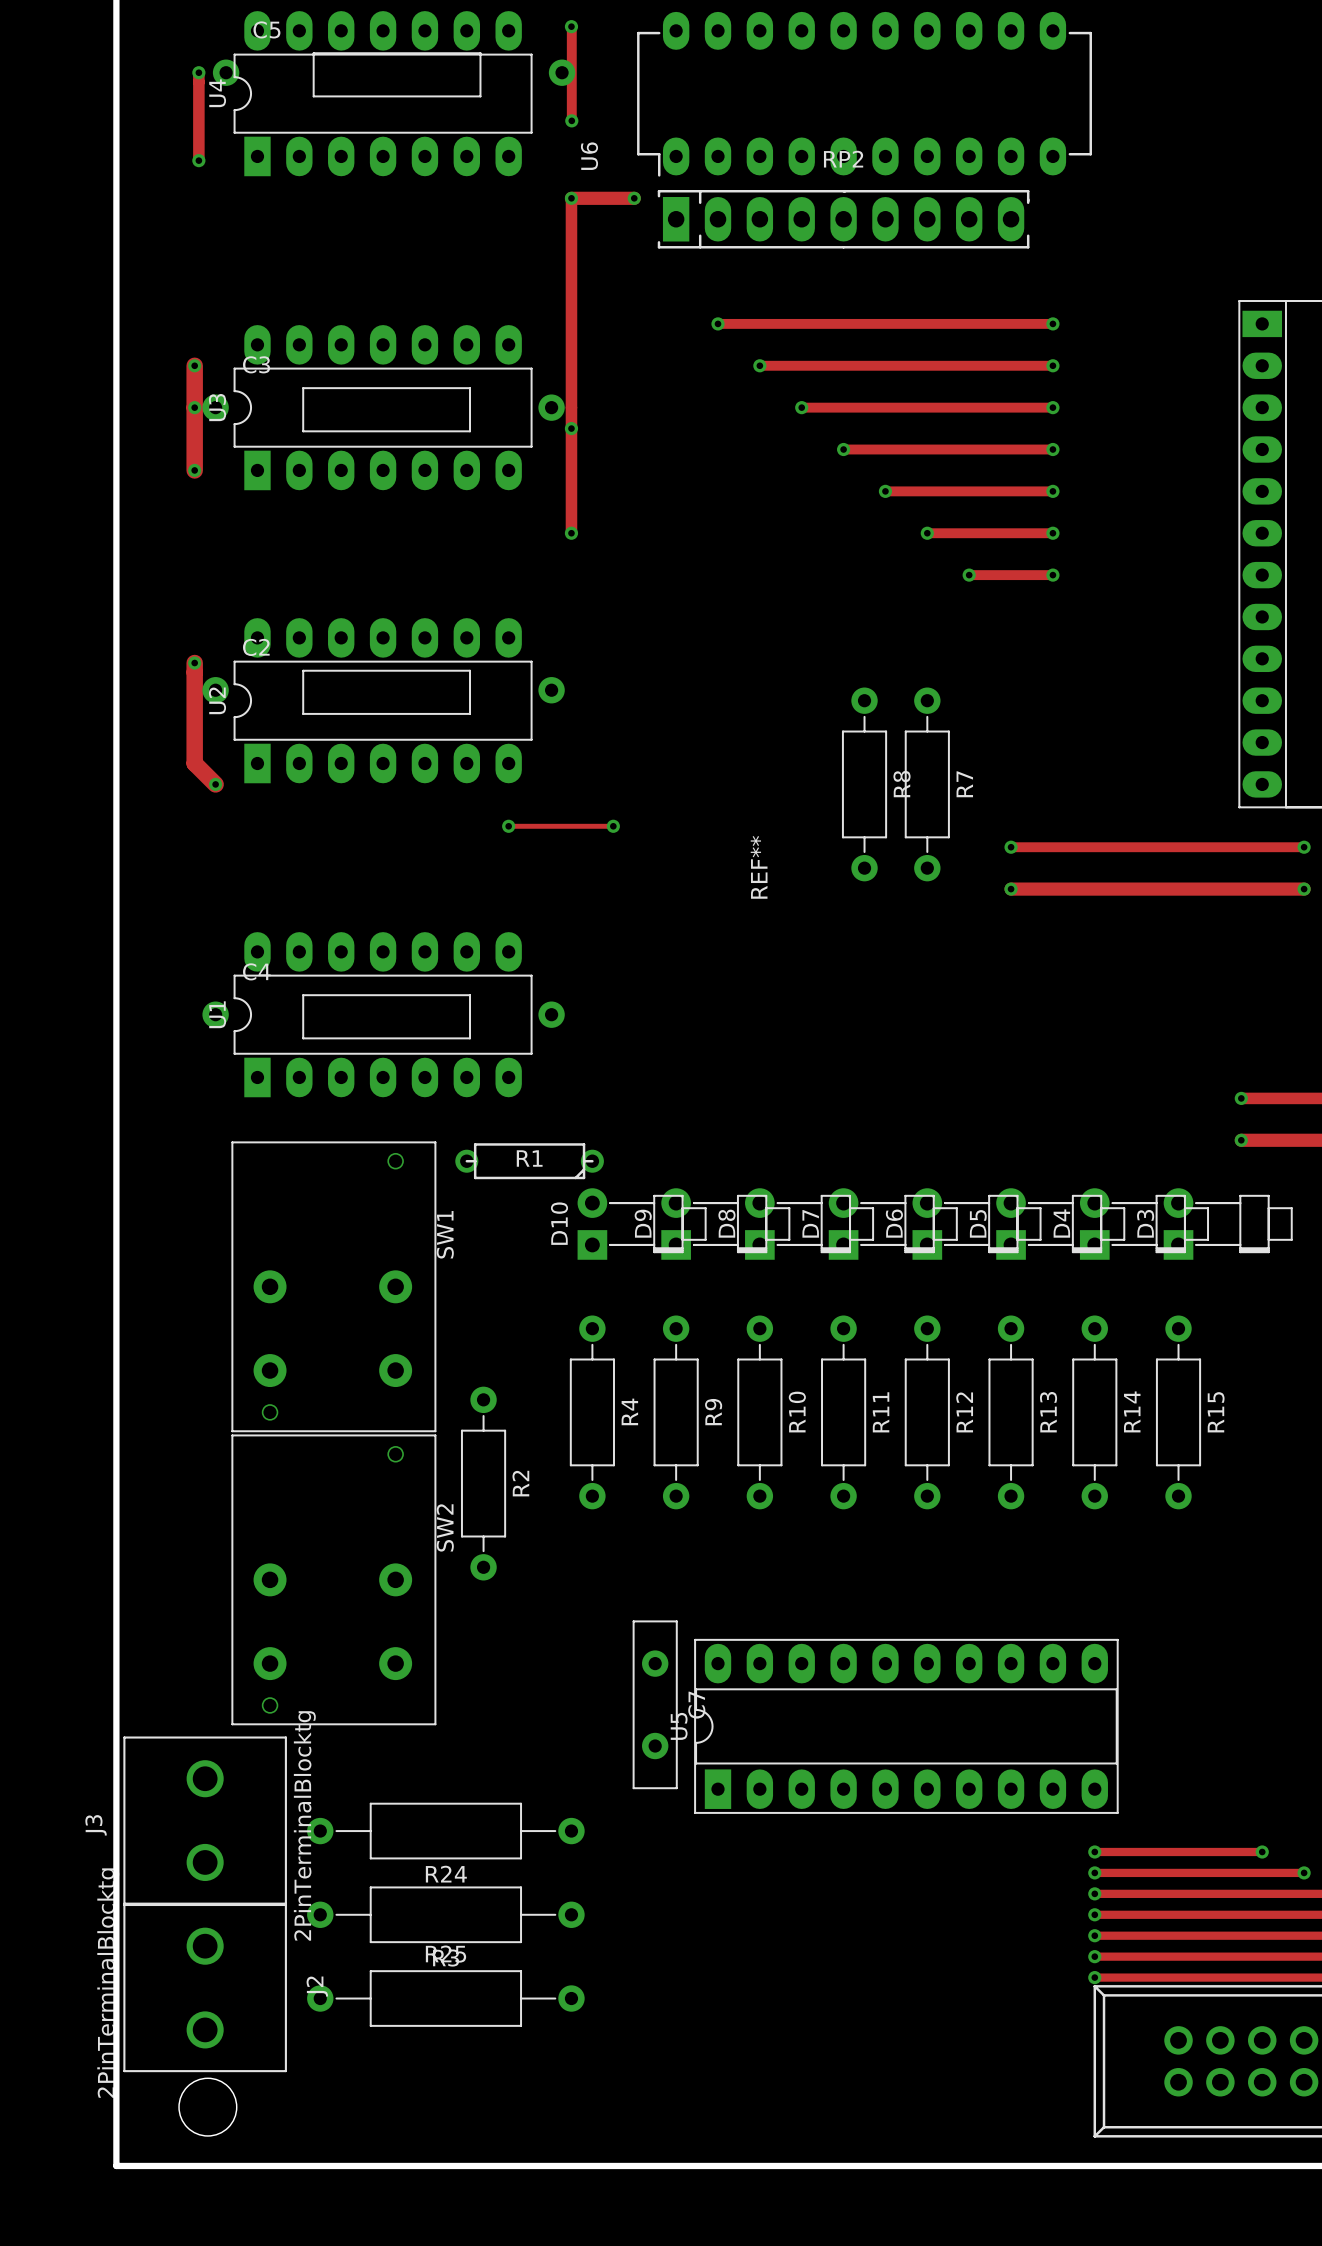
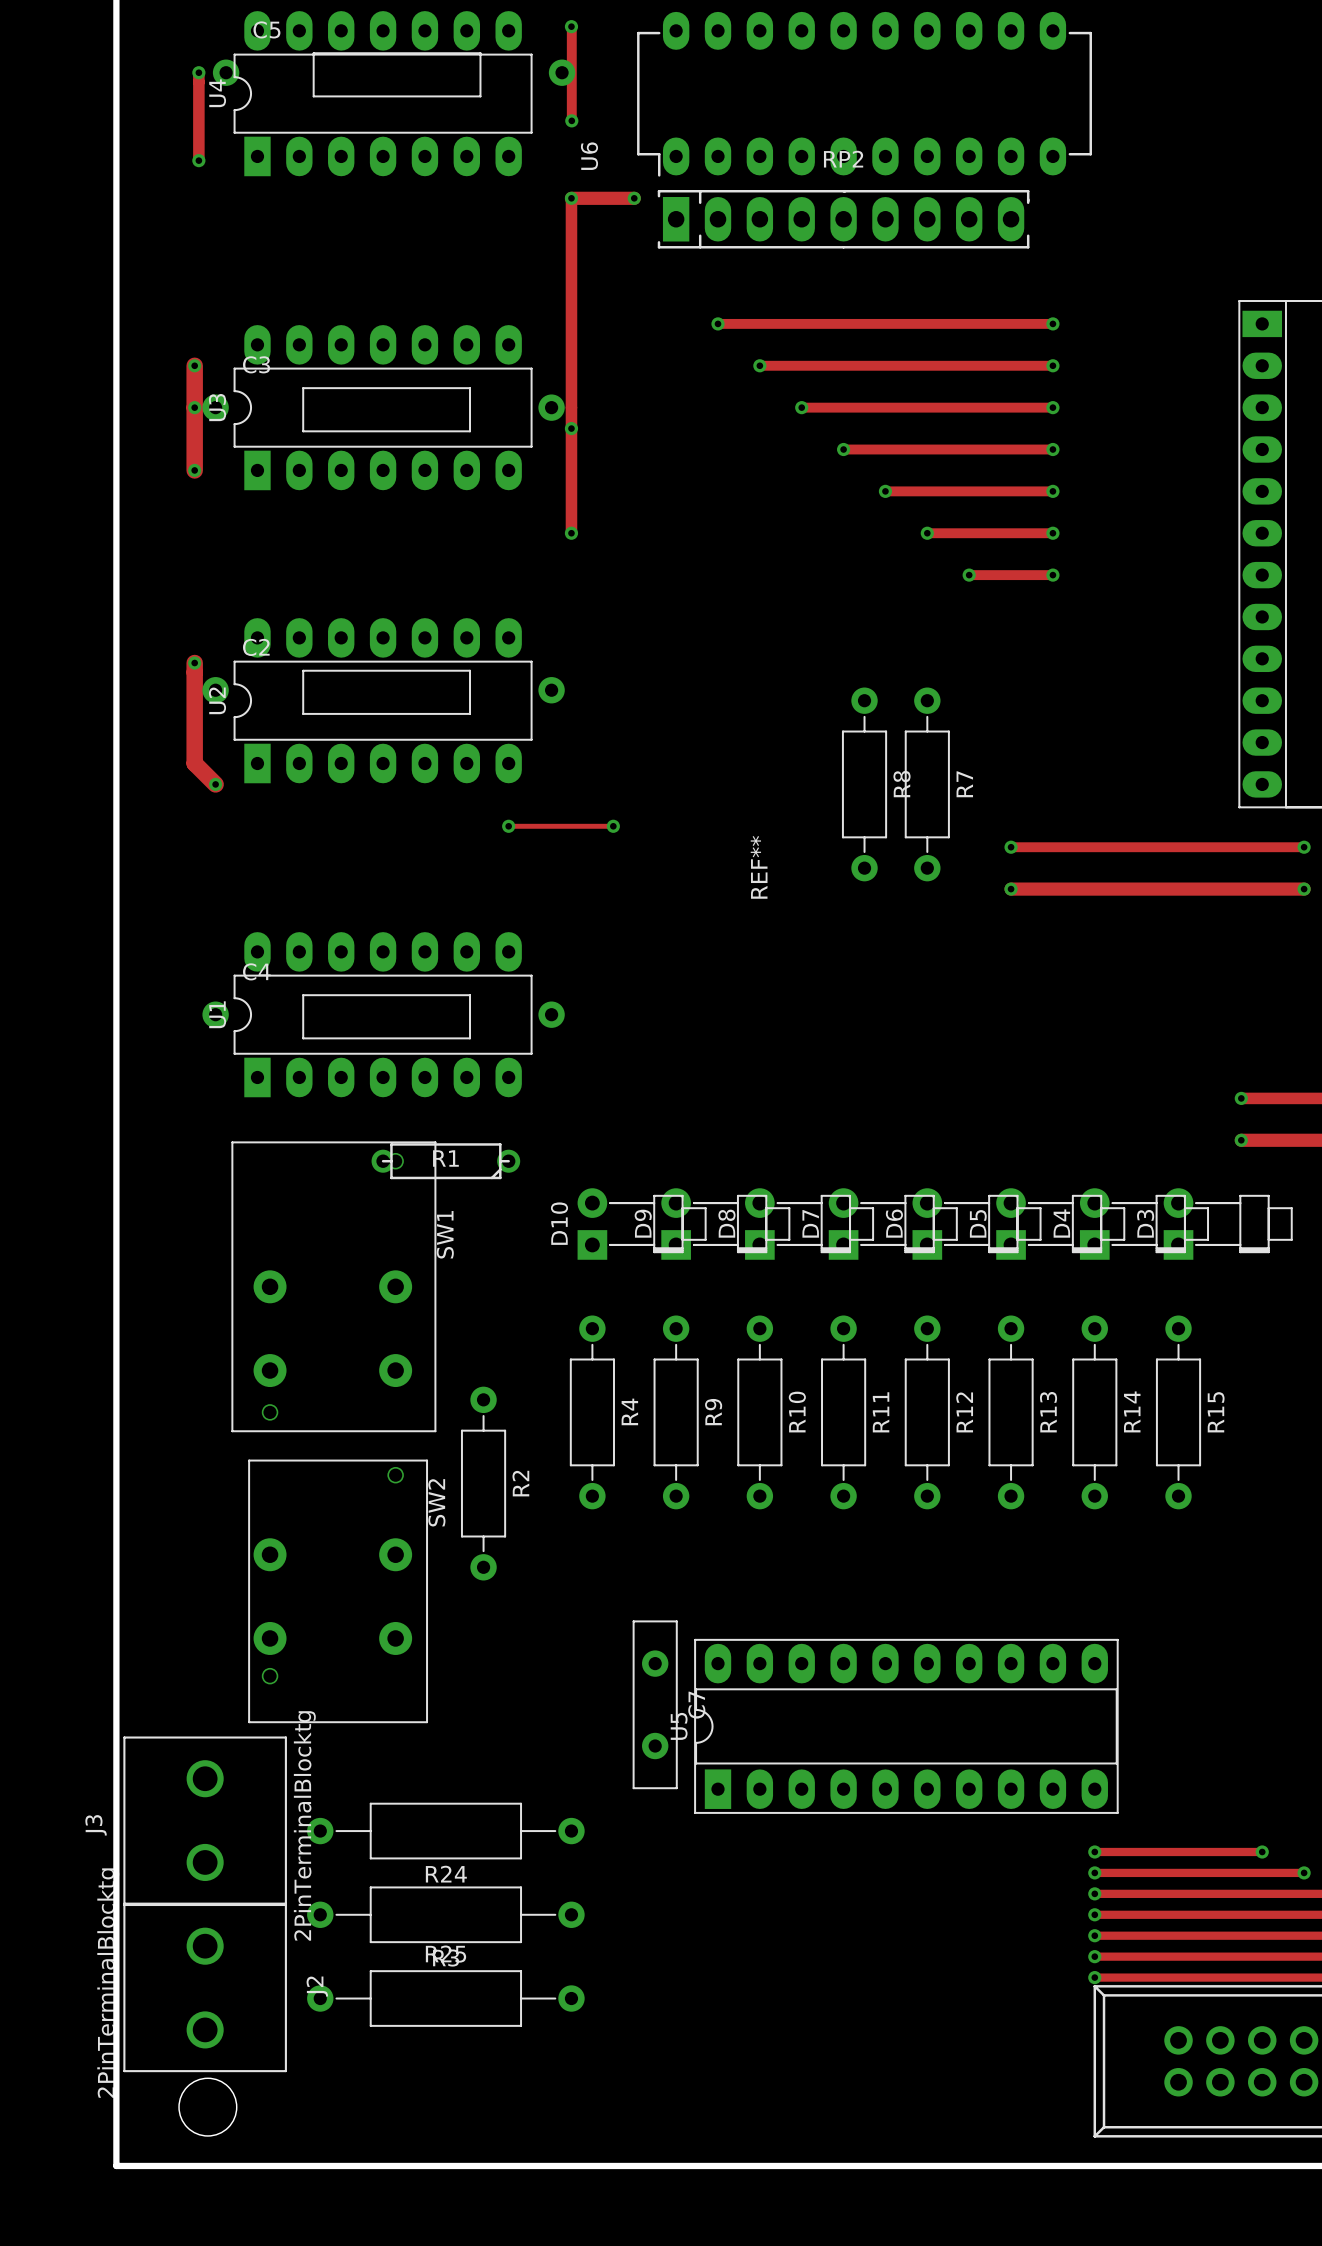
R1 position: (529, 1161) -> (445, 1161)
SW2 footprint: [231, 1434, 437, 1726] -> [248, 1459, 429, 1724]
SW2 name position: SW2 (445, 1527) -> SW2 (436, 1502)

